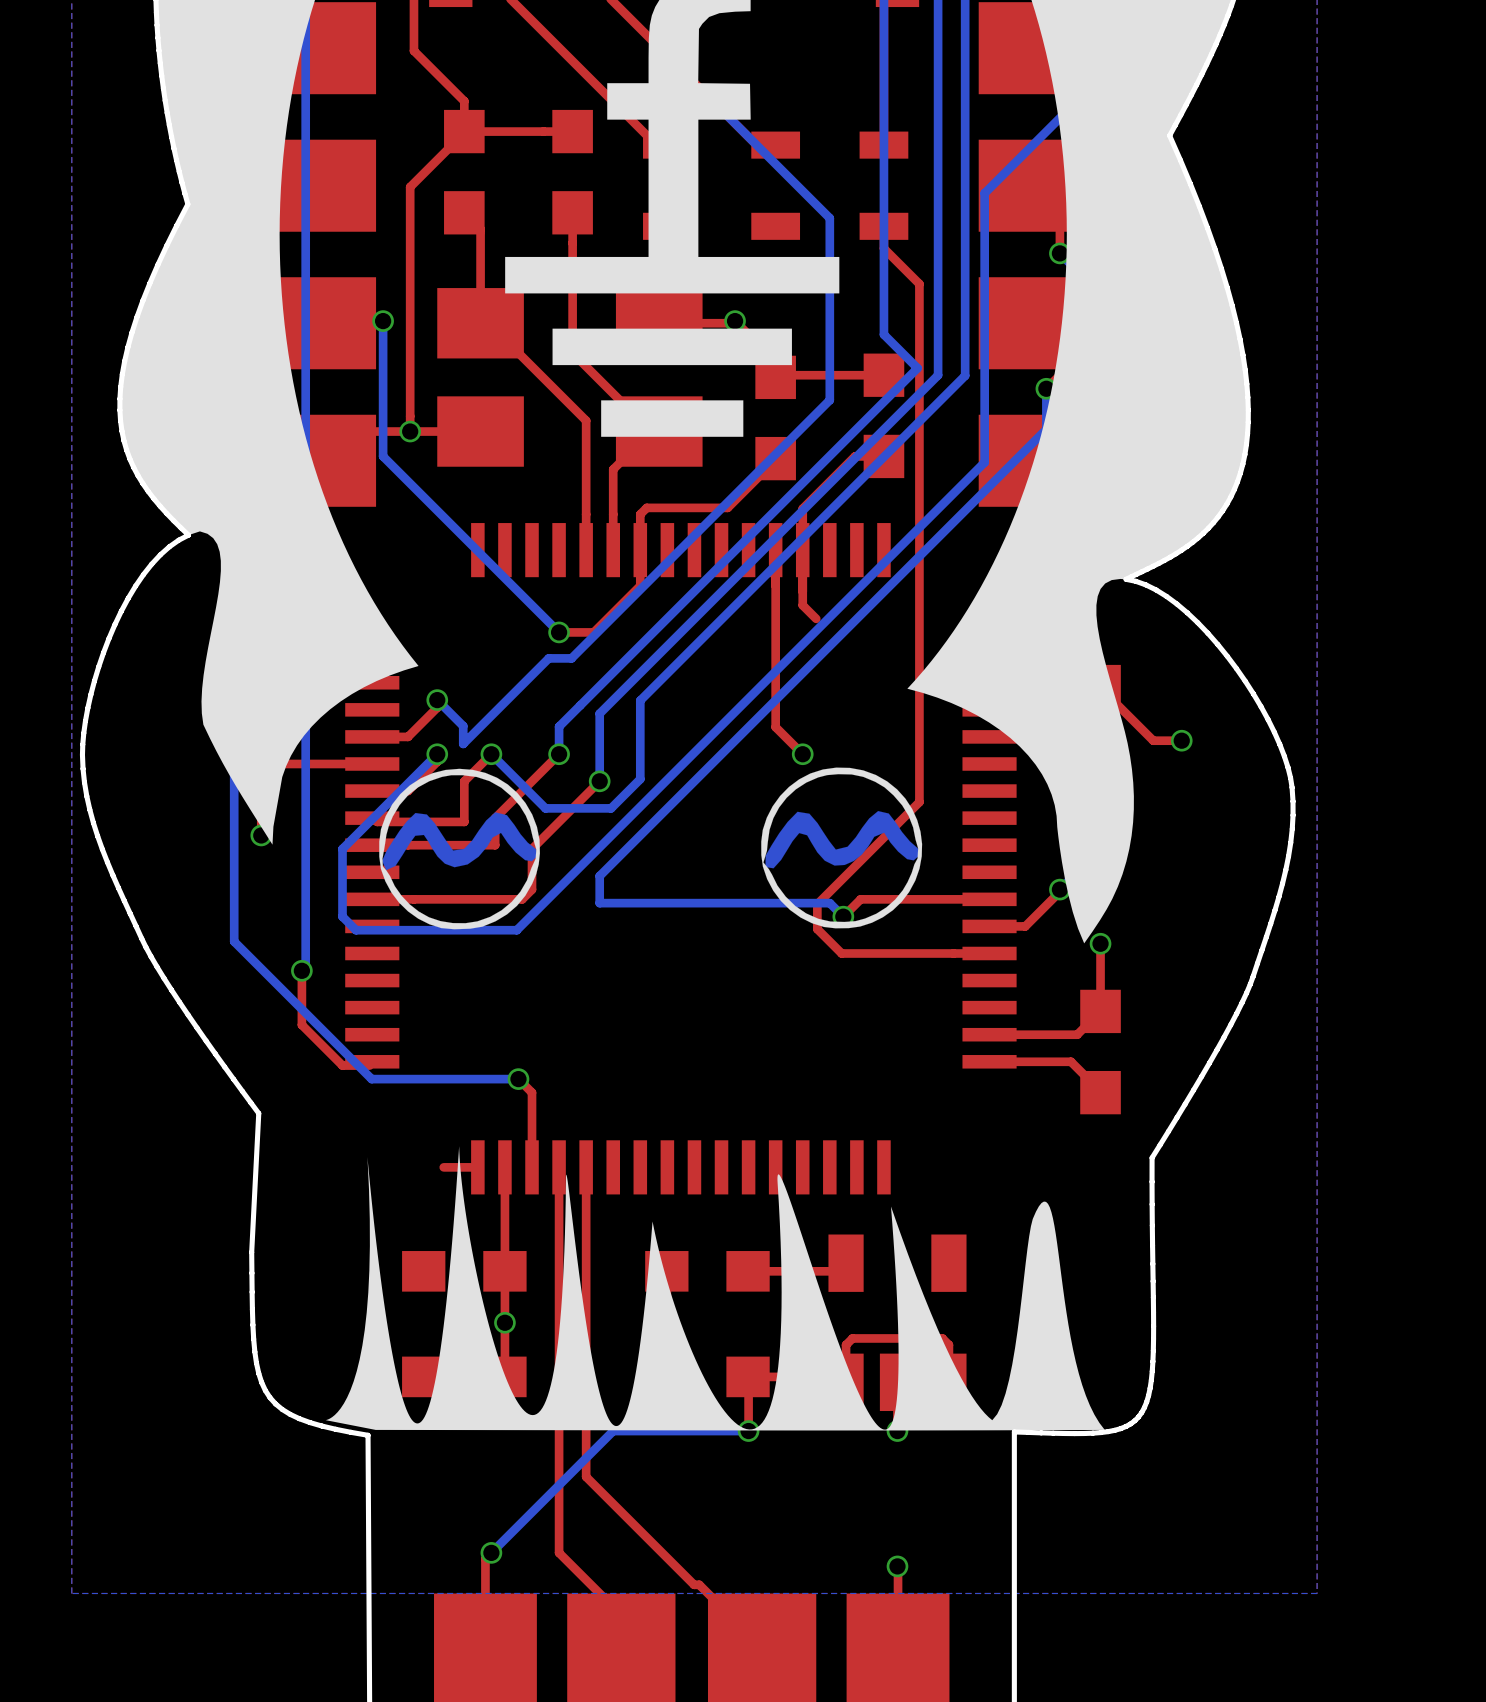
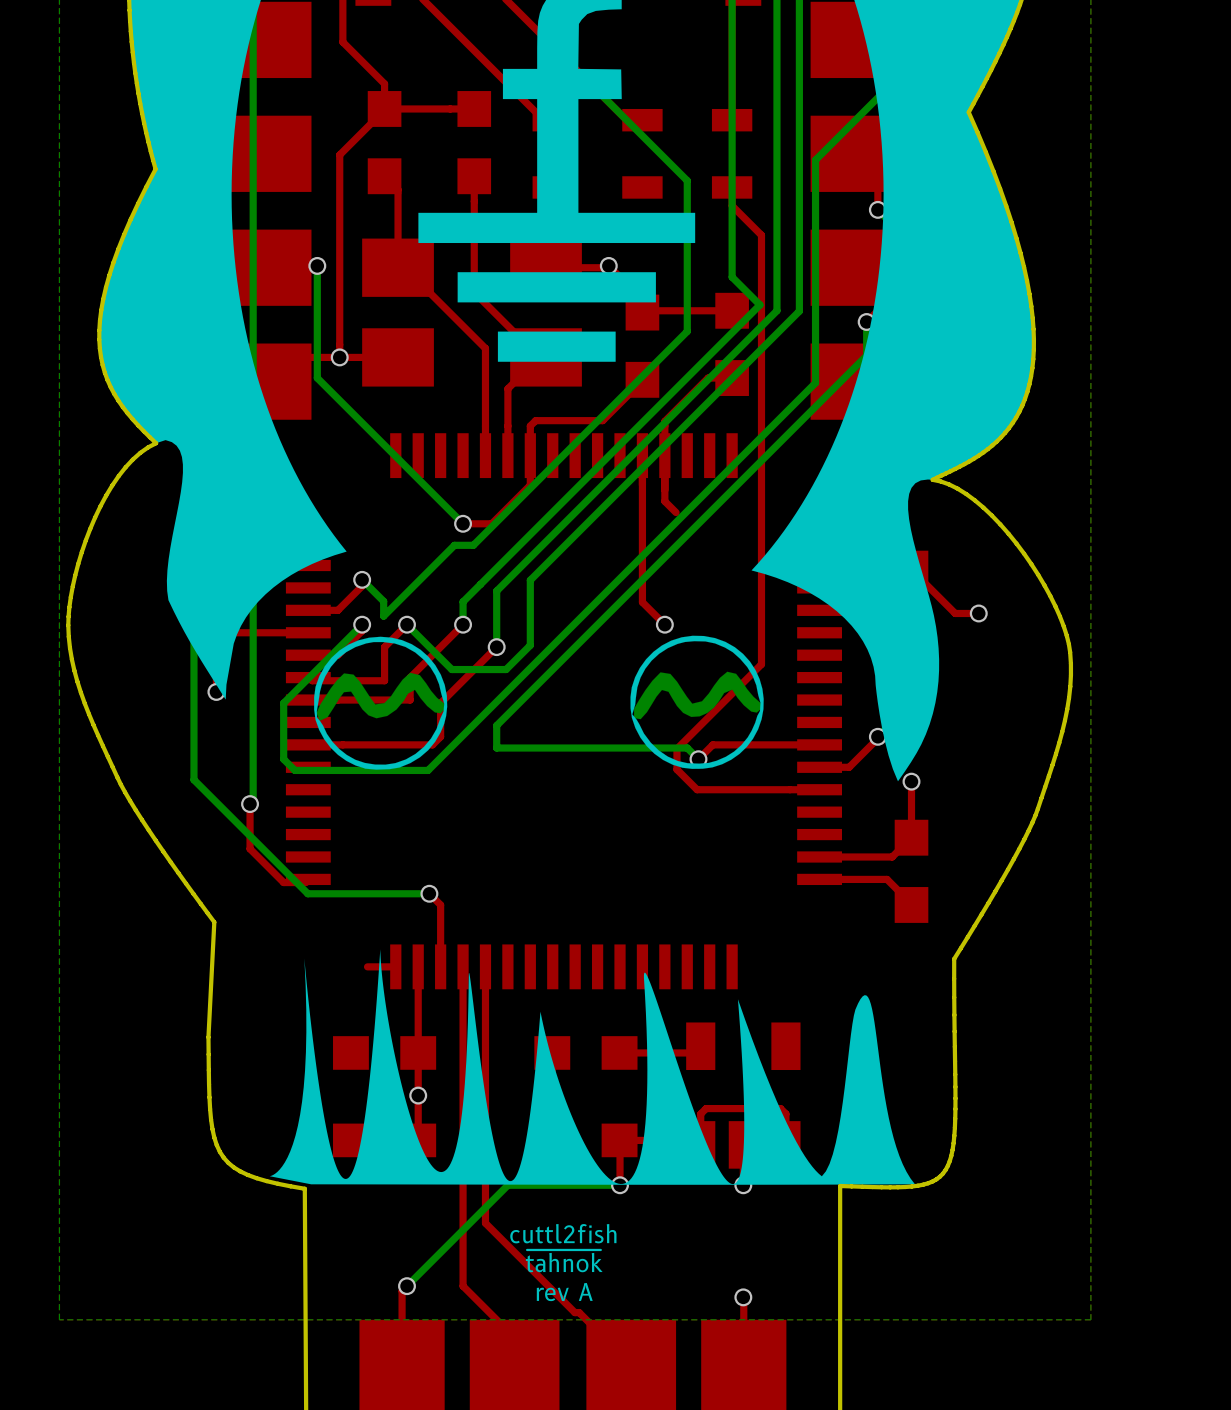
text: none -> cuttl2fish (563, 1233)
text: none -> ~{tahnok} (564, 1261)
text: none -> rev A (564, 1292)

